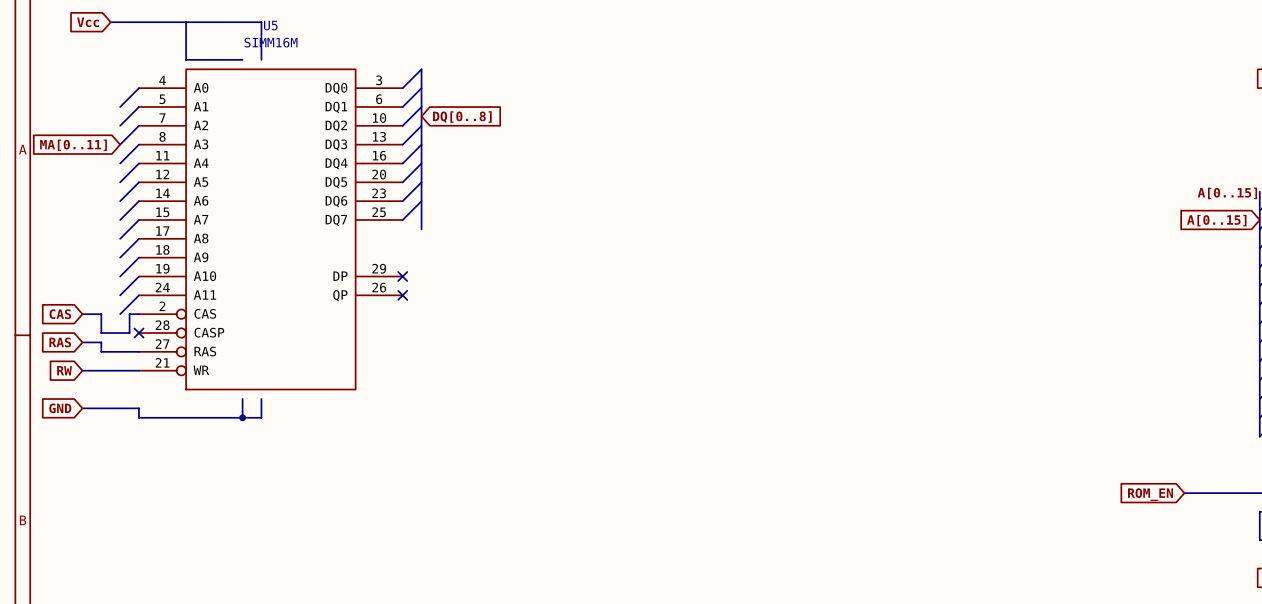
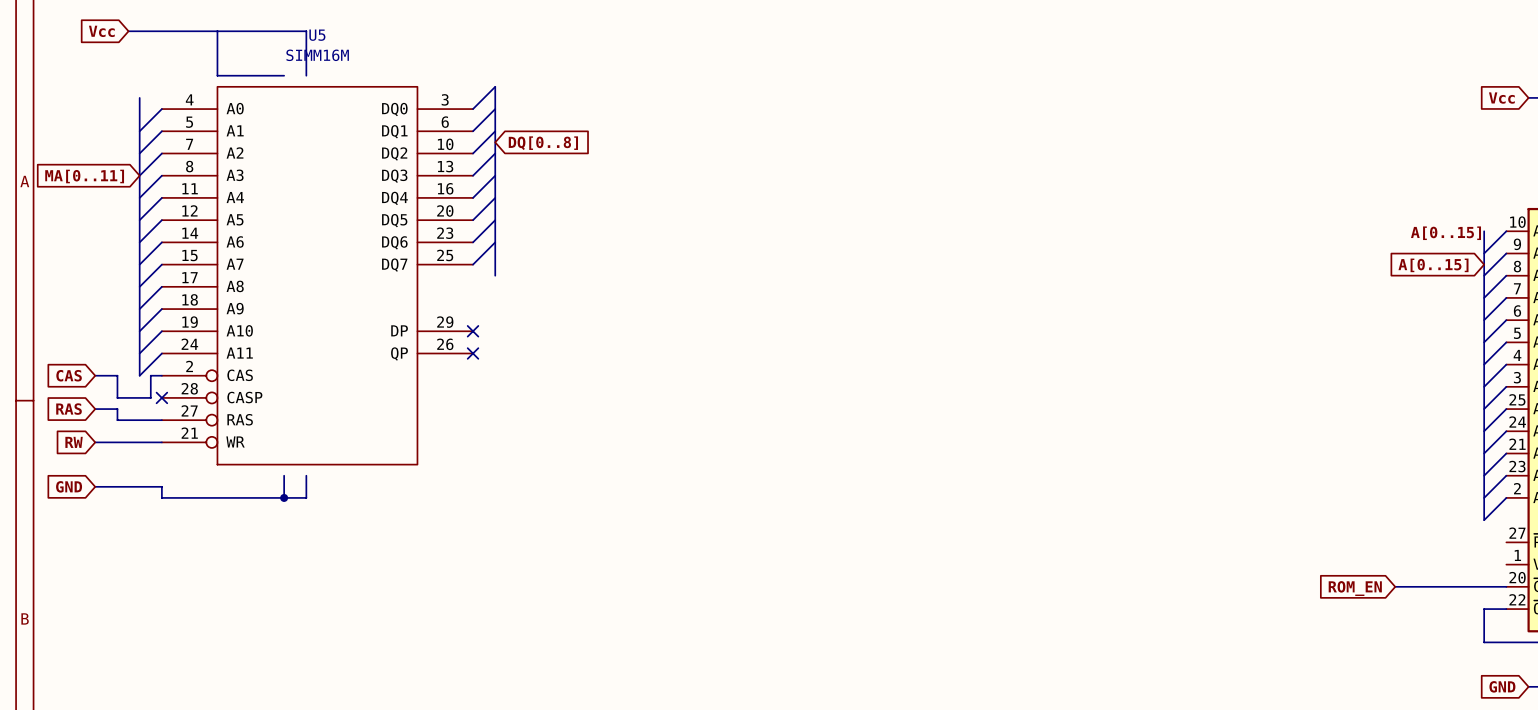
bus: none -> (139, 97) (139, 375)

